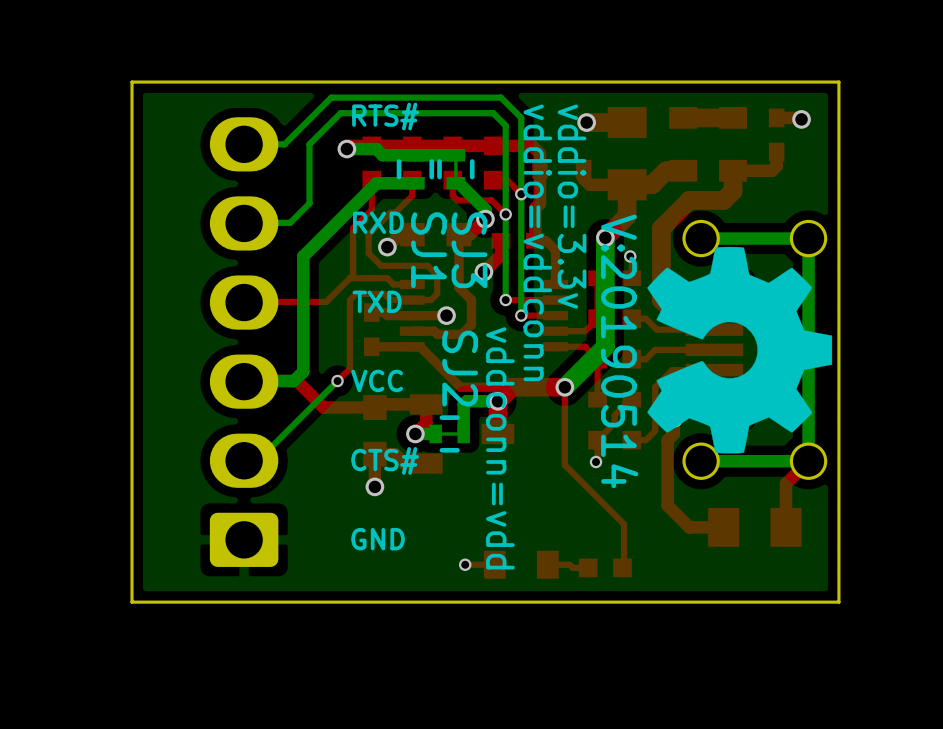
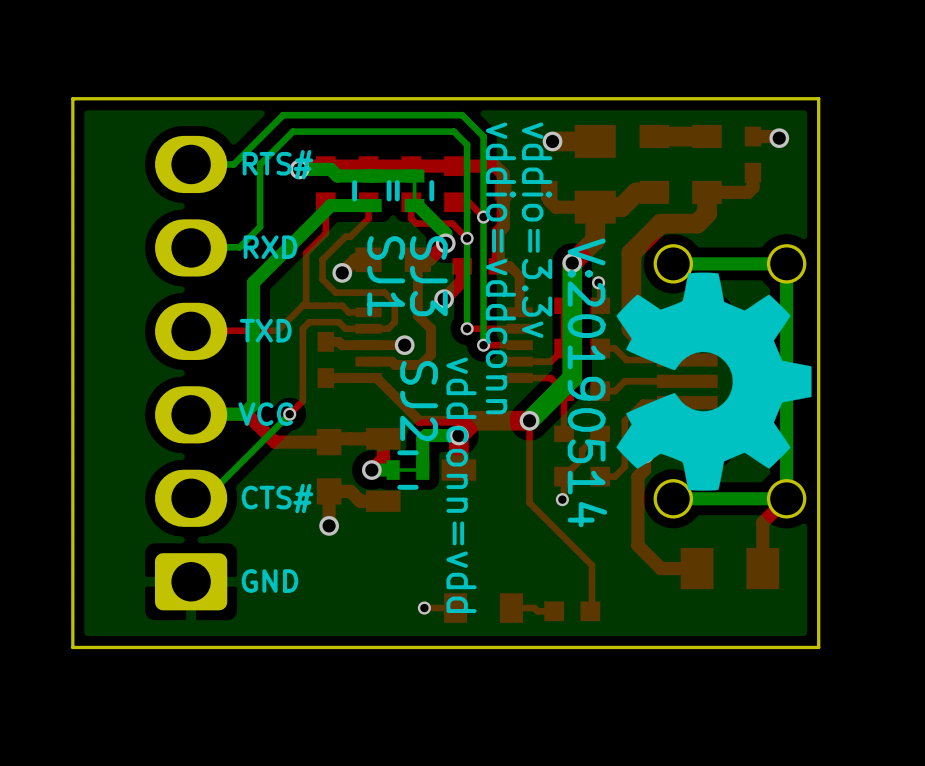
part text position: RTS# (385, 116) -> RTS# (277, 164)
part text position: RXD (378, 222) -> RXD (270, 247)
part text position: TXD (377, 301) -> TXD (265, 330)
part text position: VCC (377, 380) -> VCC (265, 414)
part text position: CTS# (385, 460) -> CTS# (277, 498)
part text position: GND (378, 539) -> GND (269, 581)

